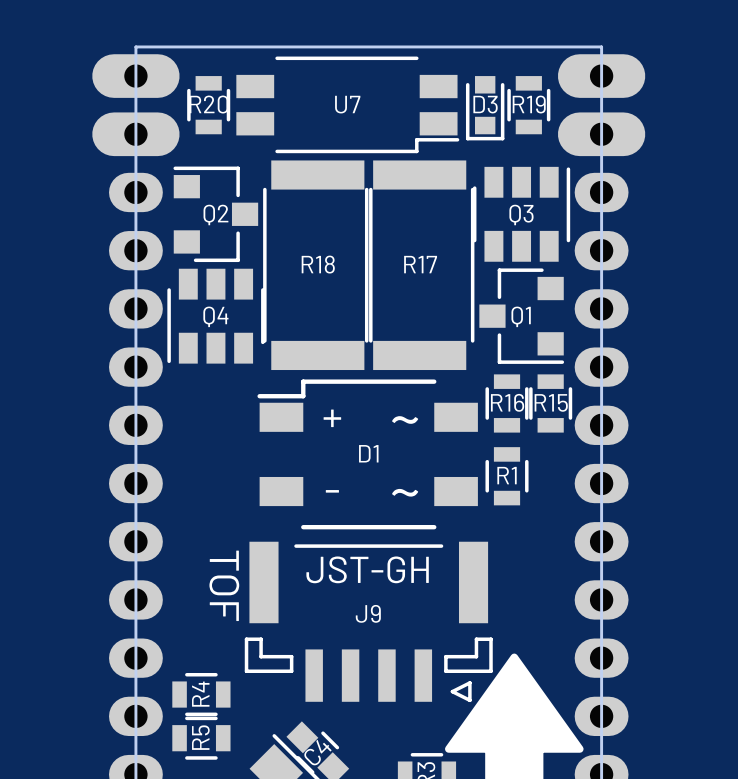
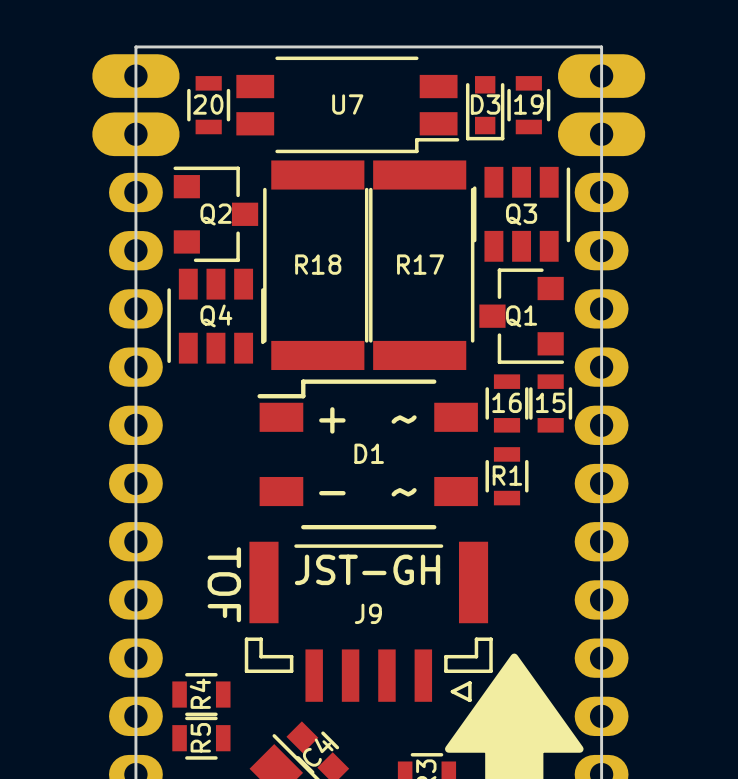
R20 name: R20 (208, 104) -> 20 (208, 104)
R19 name: R19 (529, 104) -> 19 (528, 104)
R16 name: R16 (507, 402) -> 16 (507, 402)
R15 name: R15 (551, 402) -> 15 (550, 402)

